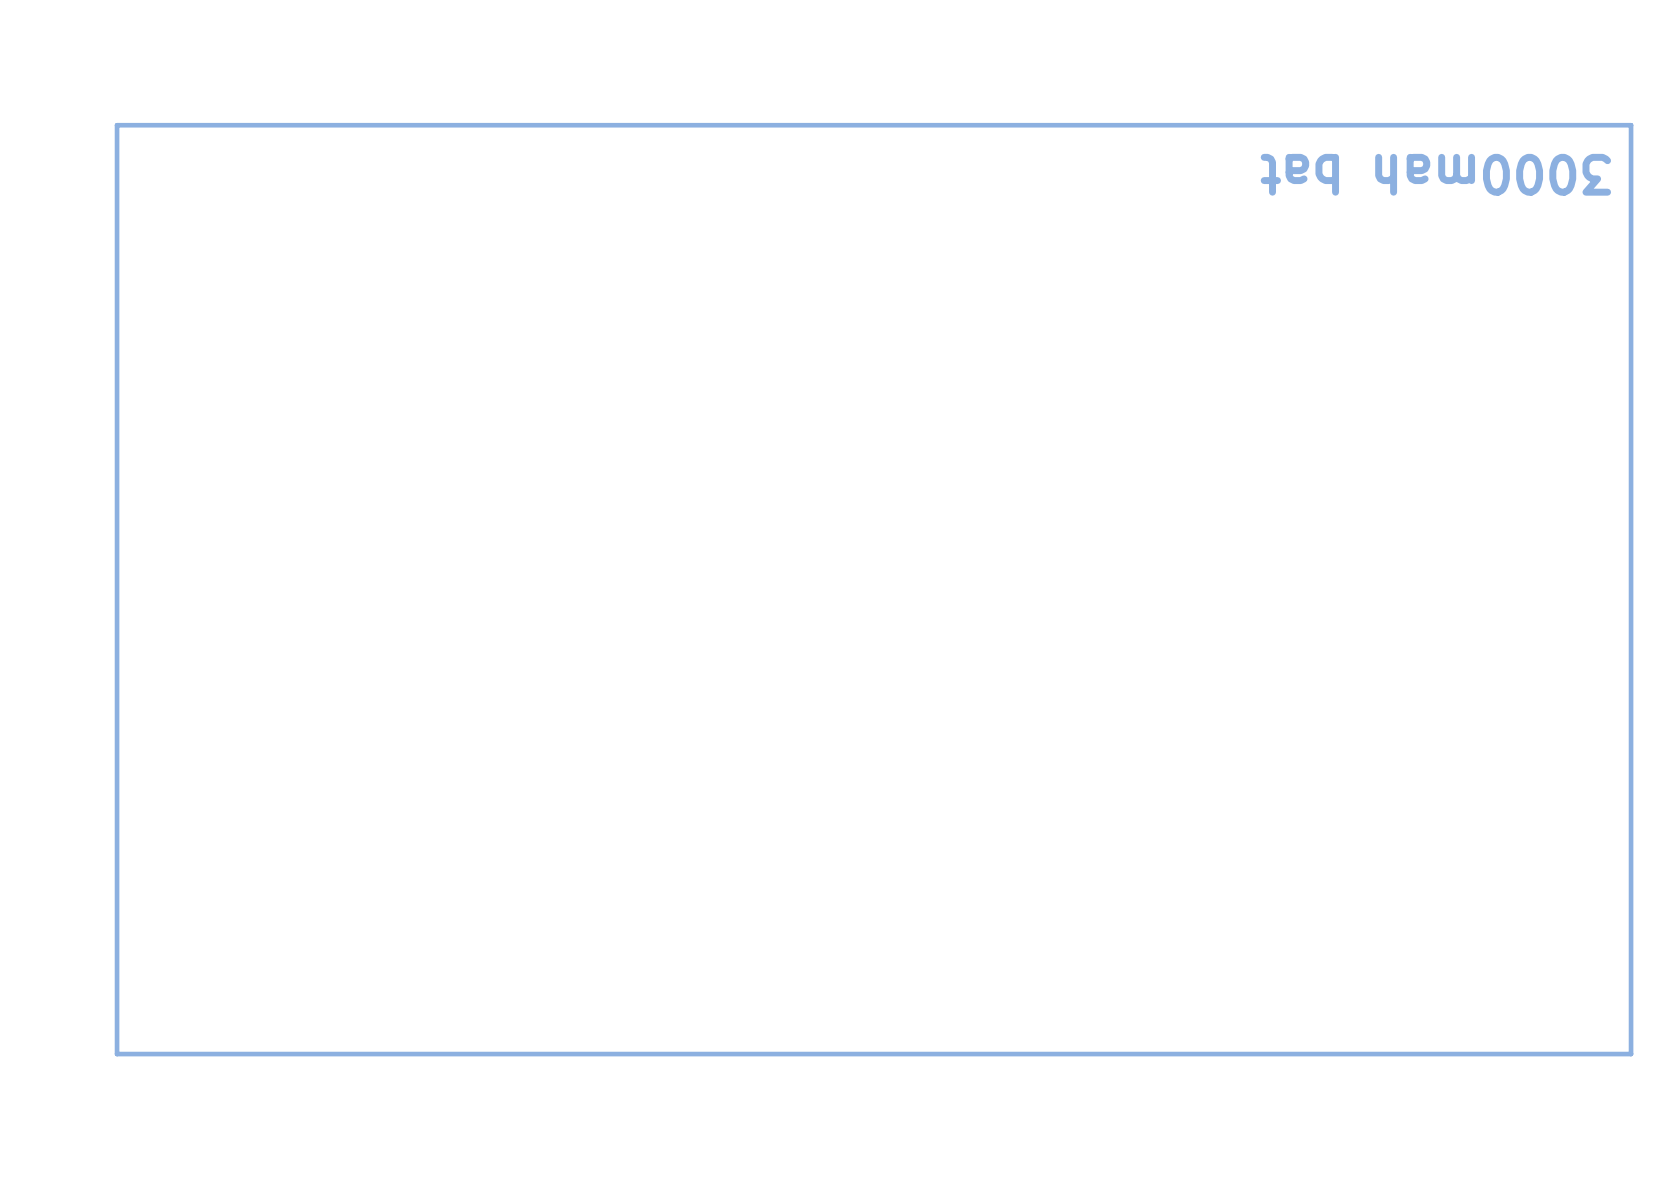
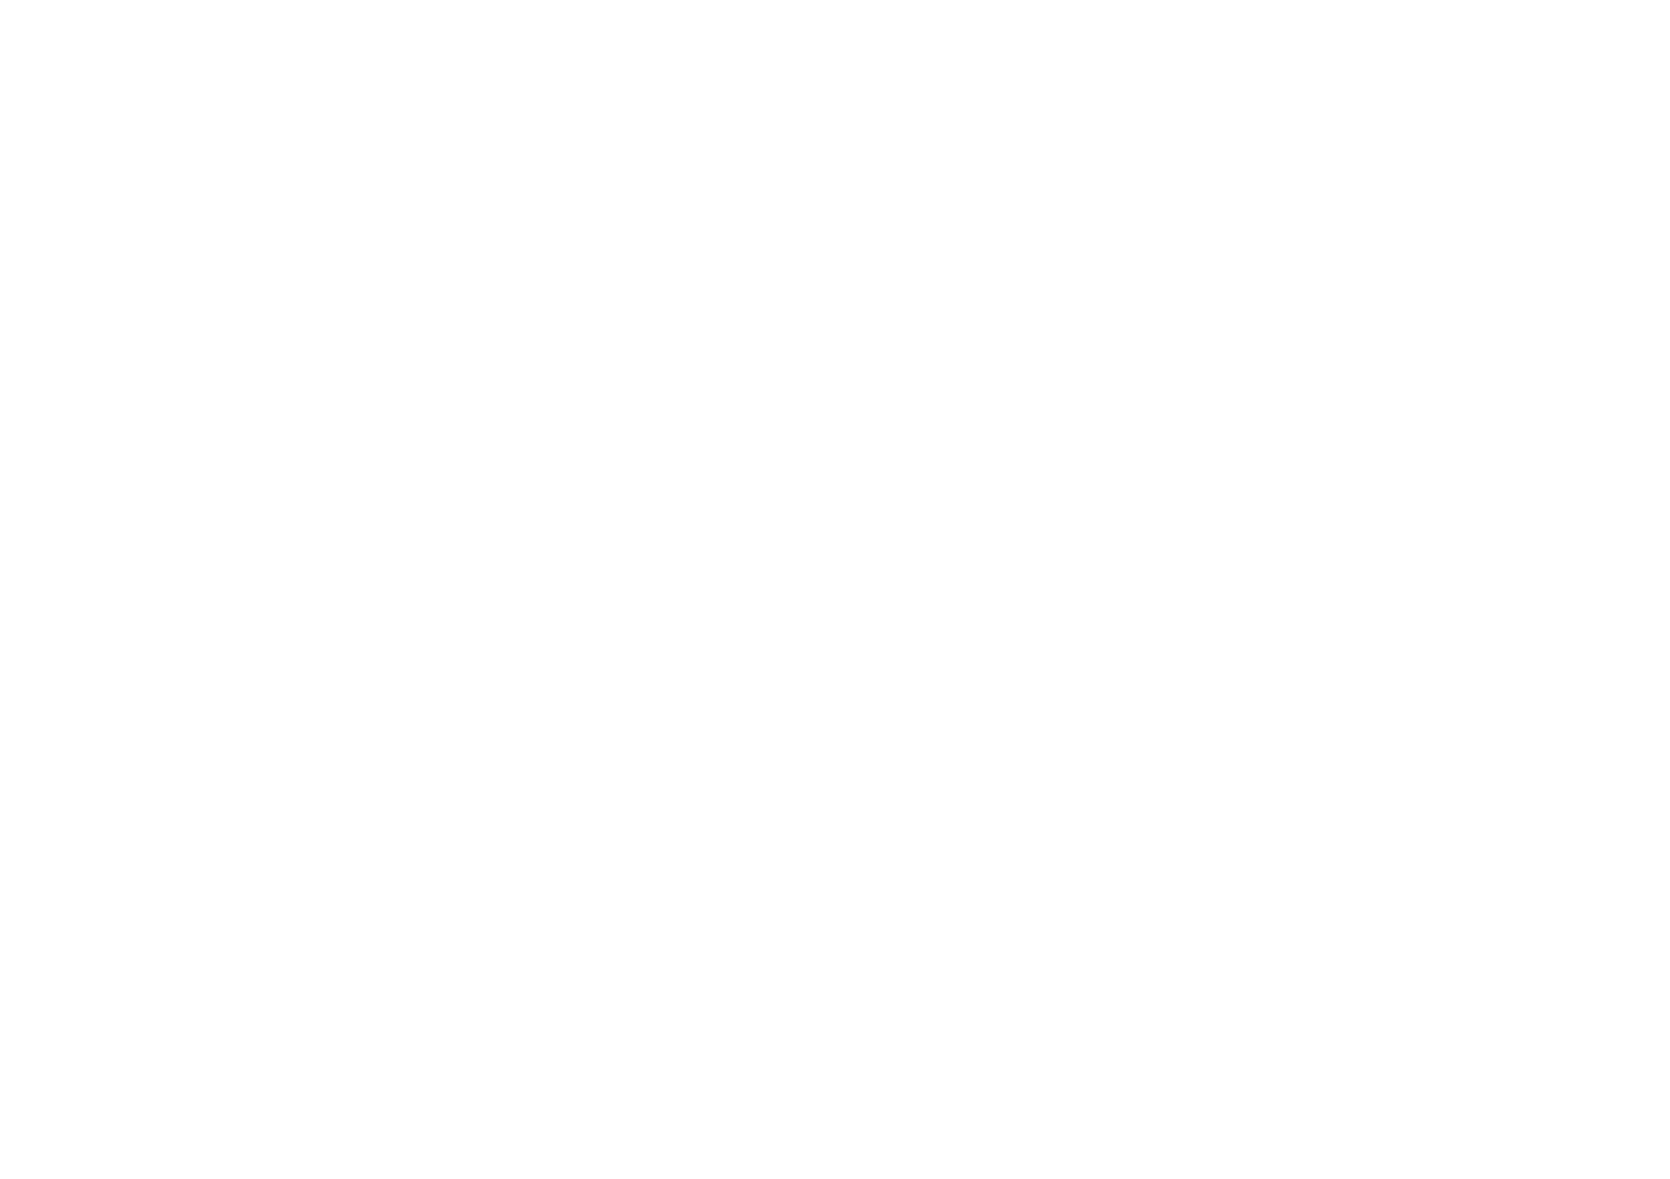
bottom track: (1631, 125) (117, 125) (117, 1054) (1631, 1054) (1631, 125) -> none
text: 3000mah bat (1435, 174) -> none

